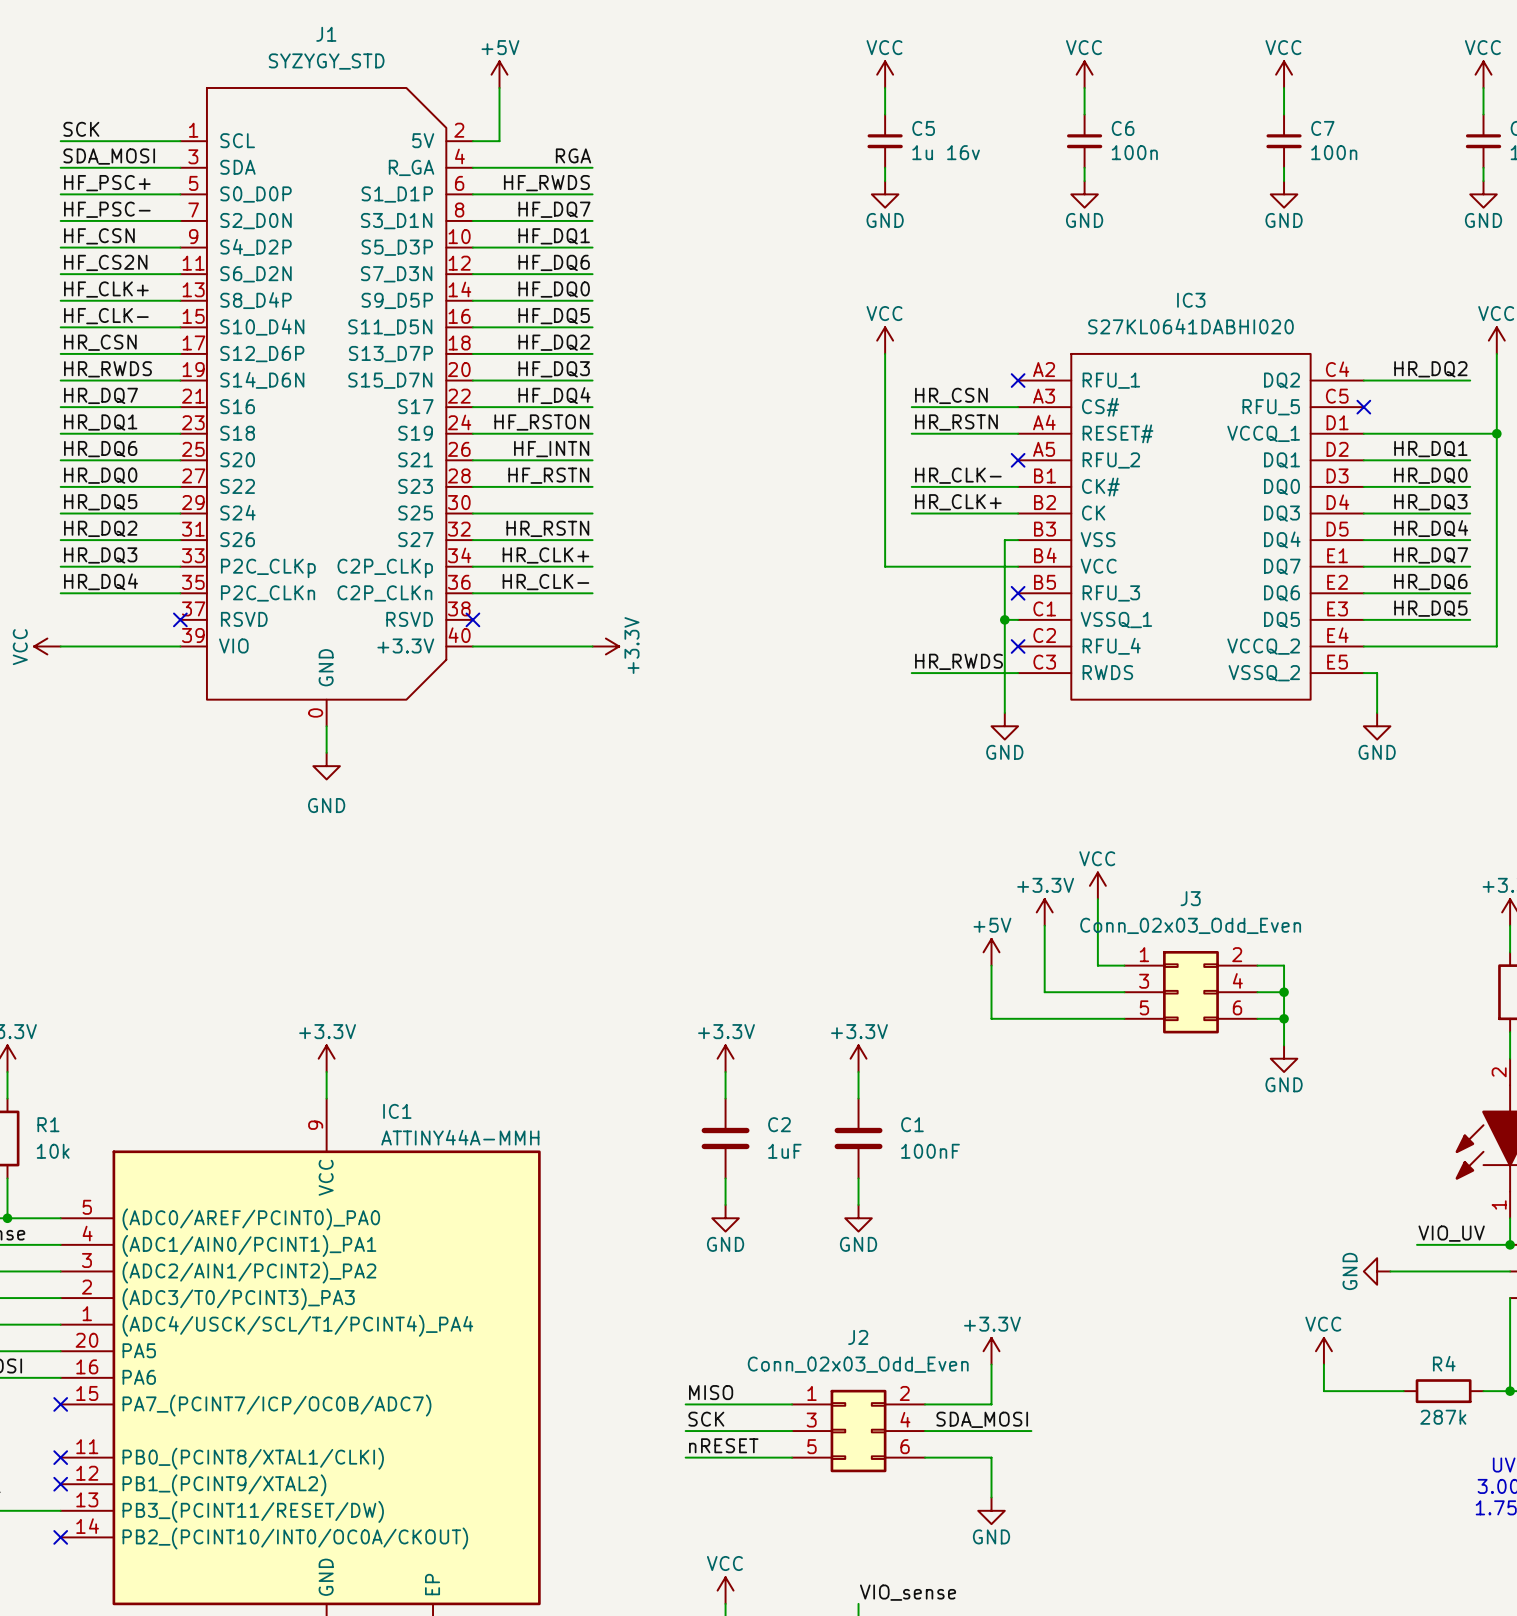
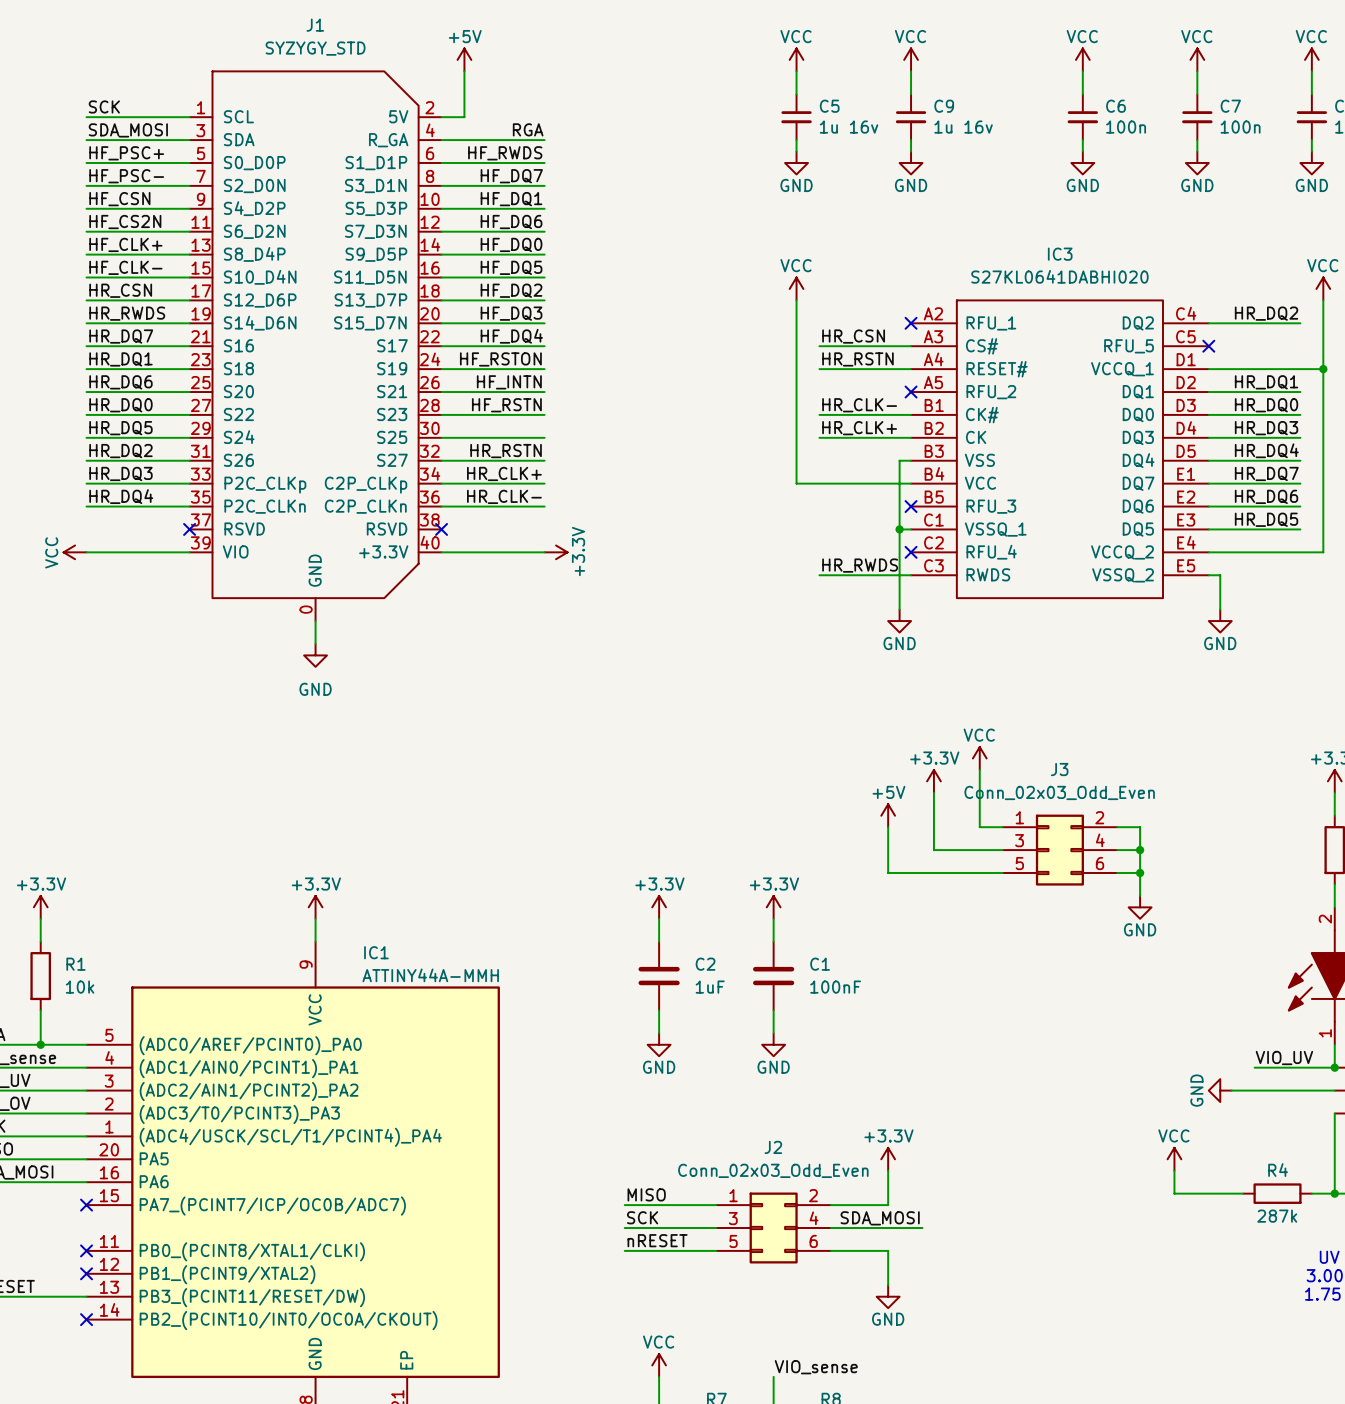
power symbol: none -> VCC (911, 59)
power symbol: VCC (1084, 74) -> none
power symbol: none -> VCC (1082, 59)
power symbol: VCC (1284, 74) -> none
power symbol: none -> VCC (1197, 59)
wire: (1084, 87) (1084, 114) -> (911, 71) (911, 94)
wire: (1284, 87) (1284, 114) -> (1082, 71) (1082, 94)
wire: none -> (1197, 71) (1197, 94)
C9: none -> 1u 16v (911, 117)
C6 position: (1084, 141) -> (1082, 117)
C7 position: (1284, 141) -> (1197, 117)
wire: (1084, 167) (1084, 181) -> (911, 140) (911, 151)
wire: (1284, 167) (1284, 181) -> (1082, 140) (1082, 151)
wire: none -> (1197, 140) (1197, 151)
power symbol: none -> GND (911, 162)
power symbol: GND (1084, 194) -> none
power symbol: none -> GND (1082, 162)
power symbol: GND (1284, 194) -> none
power symbol: none -> GND (1197, 162)

